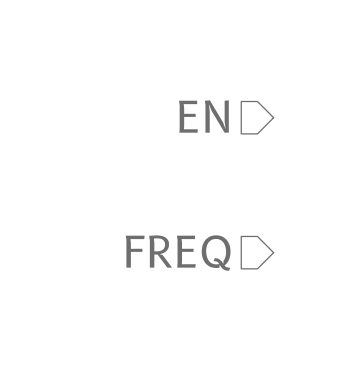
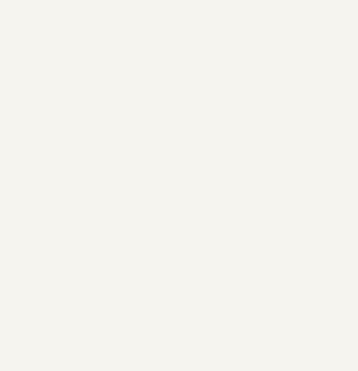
hierarchical label: EN (203, 116) -> none
hierarchical label: FREQ (178, 253) -> none

